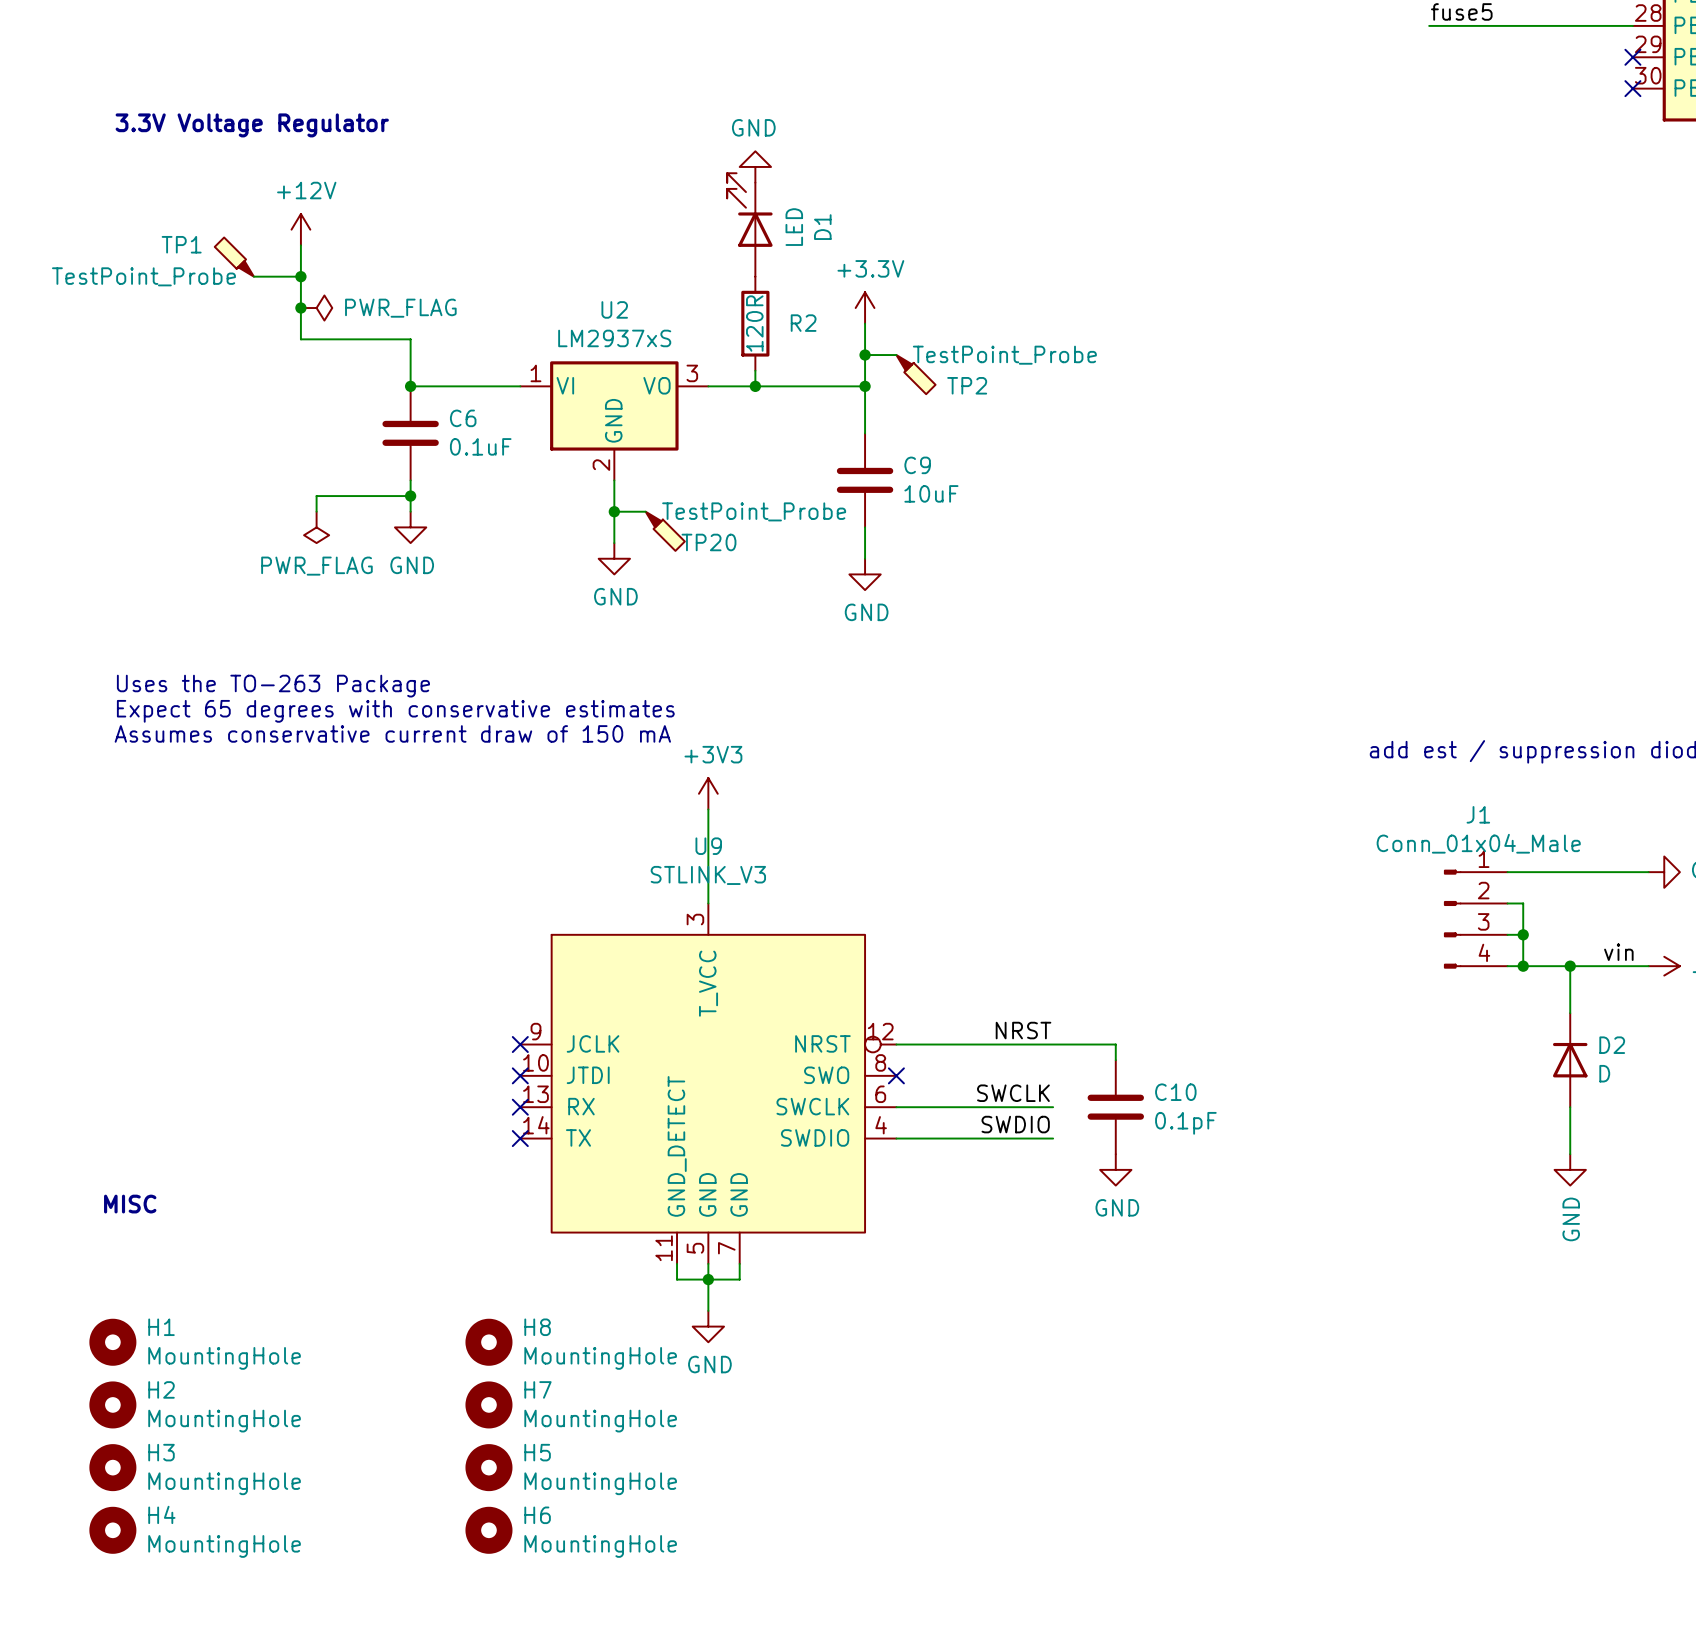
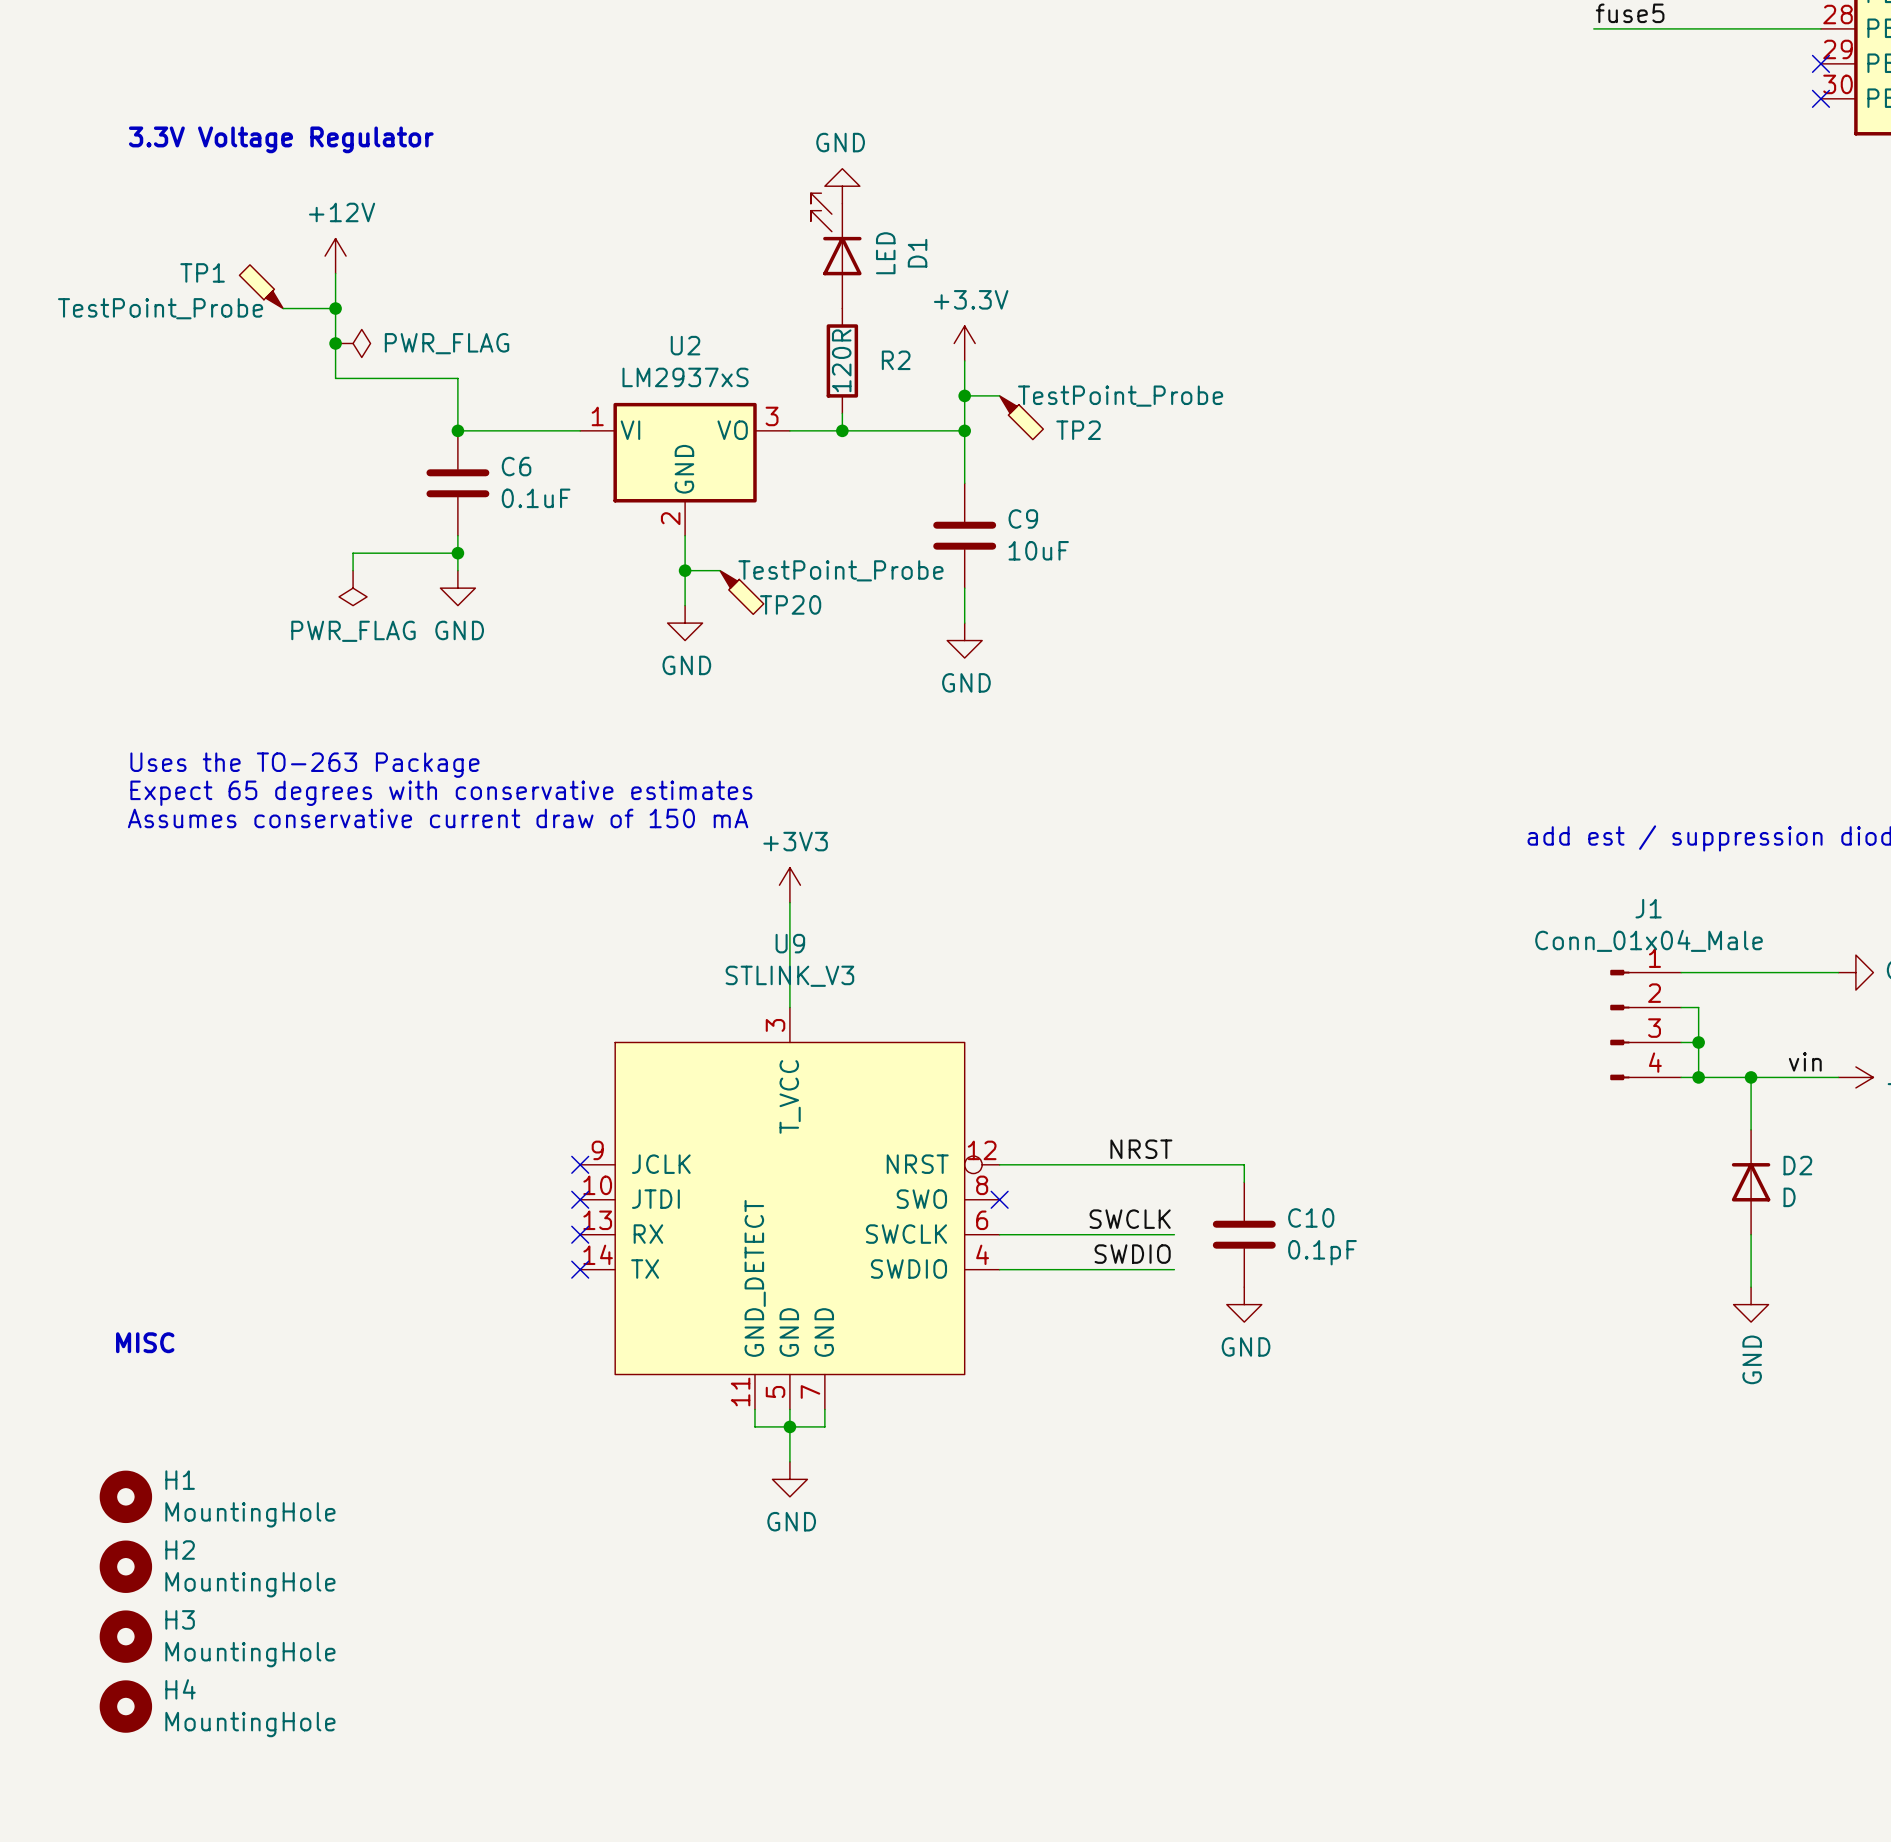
H8: MountingHole (488, 1342) -> none
H7: MountingHole (488, 1404) -> none
H5: MountingHole (488, 1467) -> none
H6: MountingHole (488, 1530) -> none

